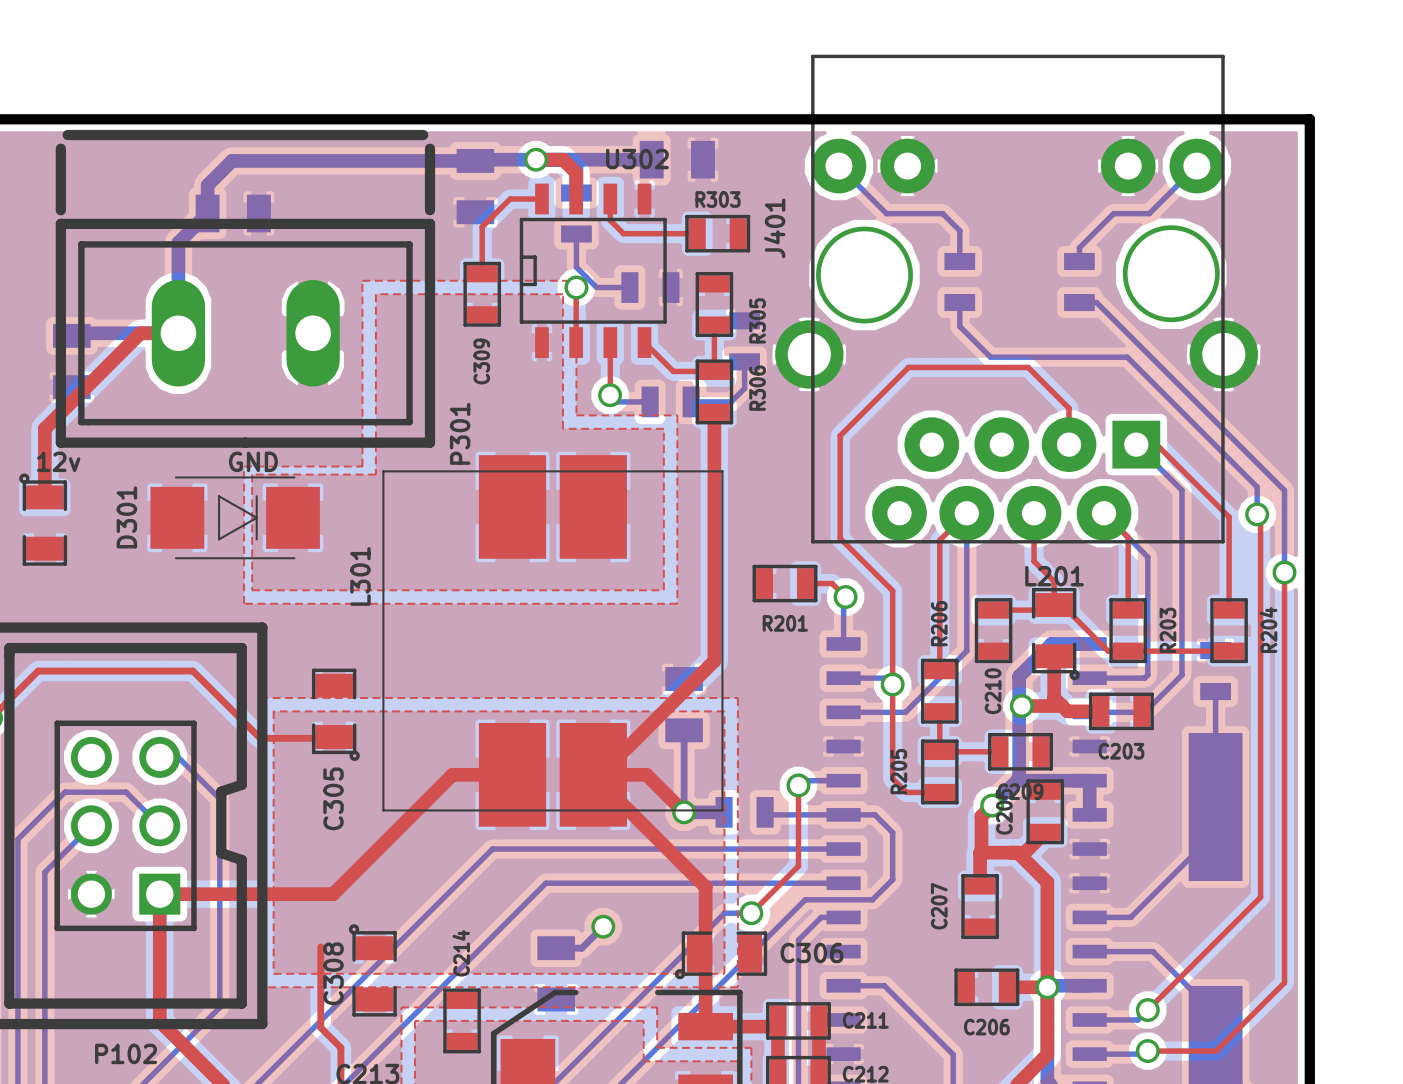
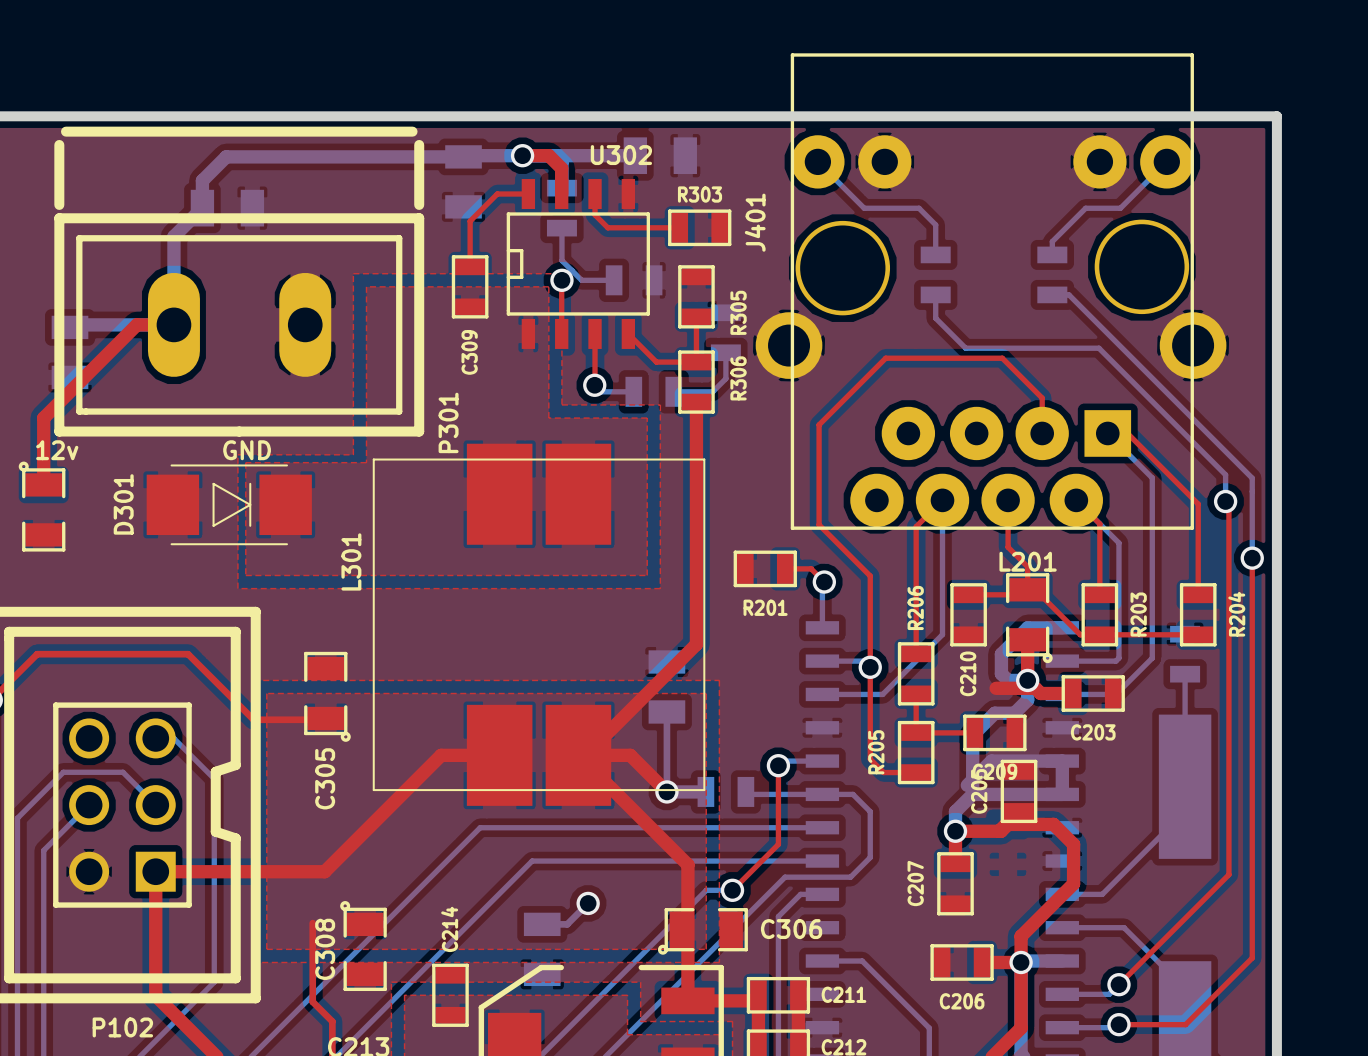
bottom track: (1054, 643) (1051, 643) (1019, 676) (1019, 780) -> (1027, 627) (1001, 654) (1001, 673) (1008, 680) (1027, 680) (1027, 700) (1014, 713) (994, 713) (972, 735) (972, 794)
via position: (1021, 706) -> (1027, 680)
top track: (992, 805) (981, 816) (981, 852) -> none
via position: (992, 805) -> (955, 831)
bottom track: none -> (972, 794) (955, 811) (955, 831)
bottom track: none -> (972, 794) (1062, 794)
top track: (1017, 852) (1047, 882) (1047, 960) -> (999, 831) (1008, 824) (1053, 824) (1073, 844) (1073, 883) (1021, 936)

